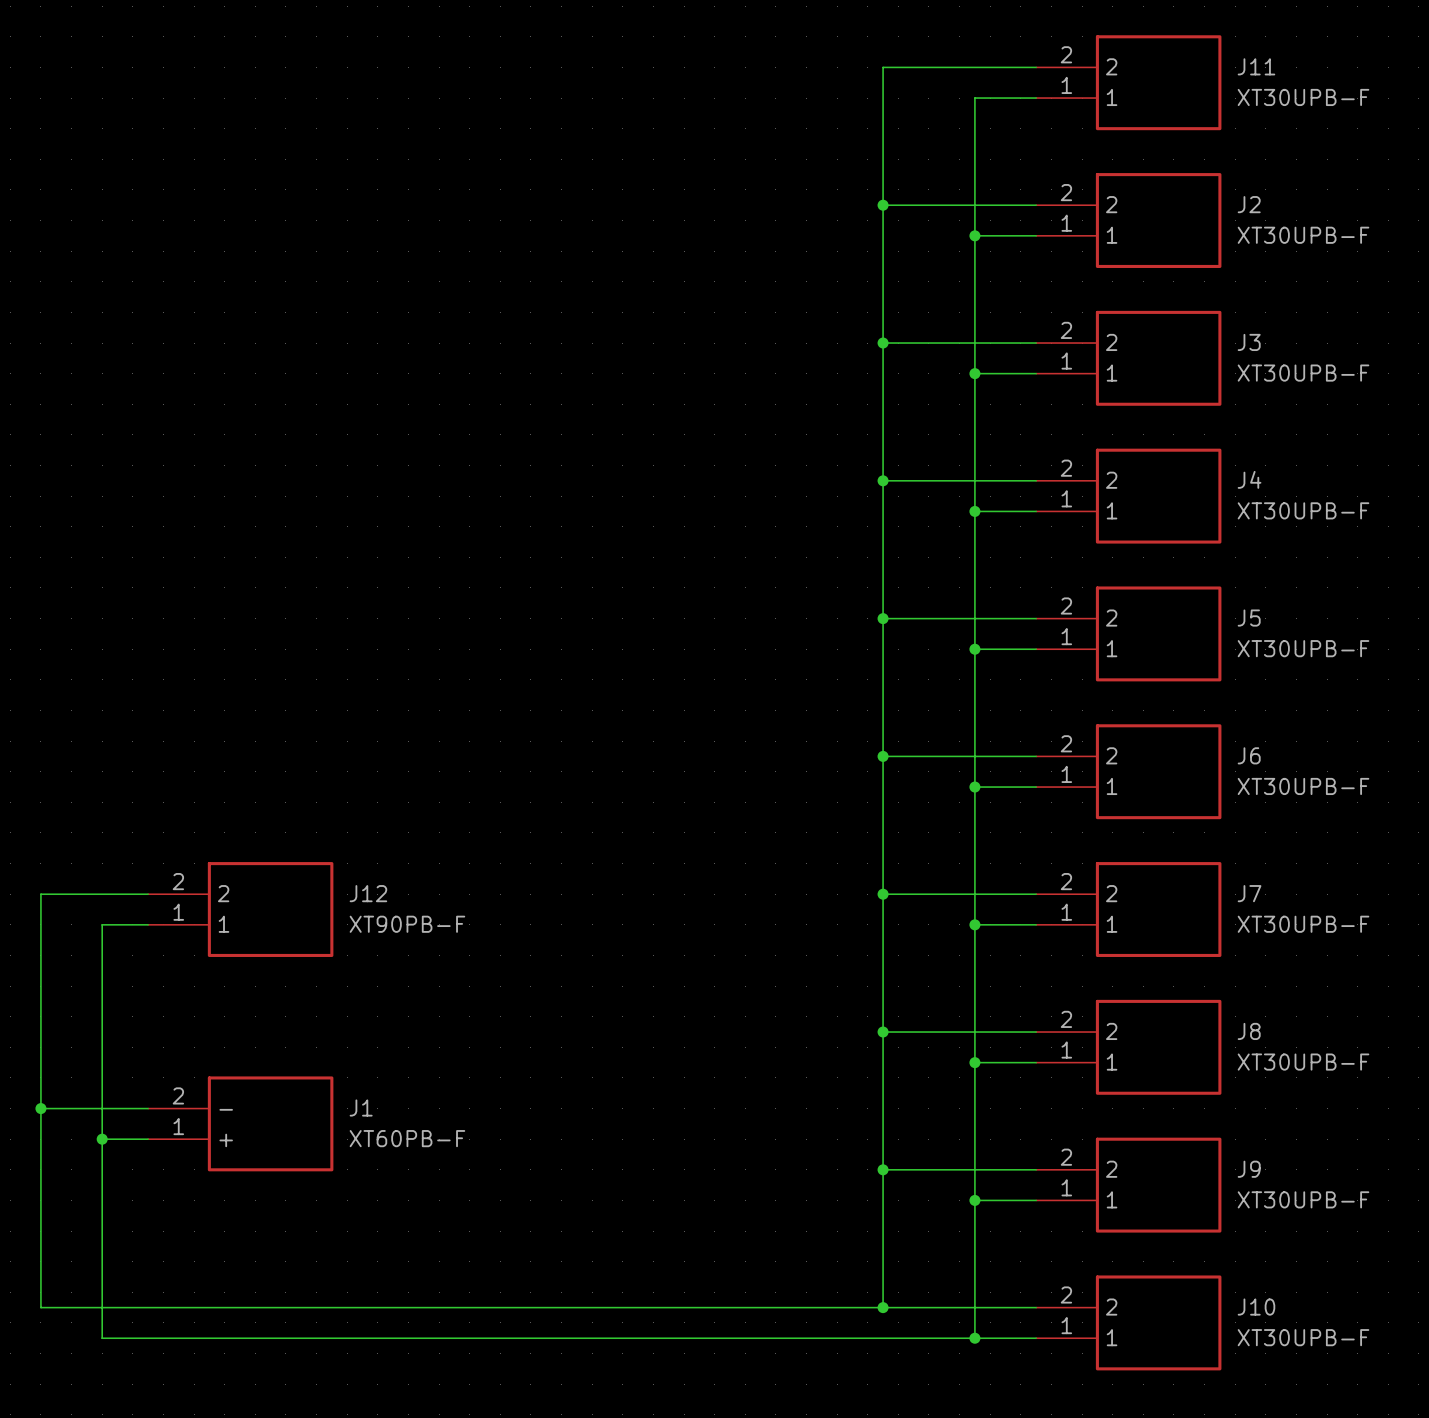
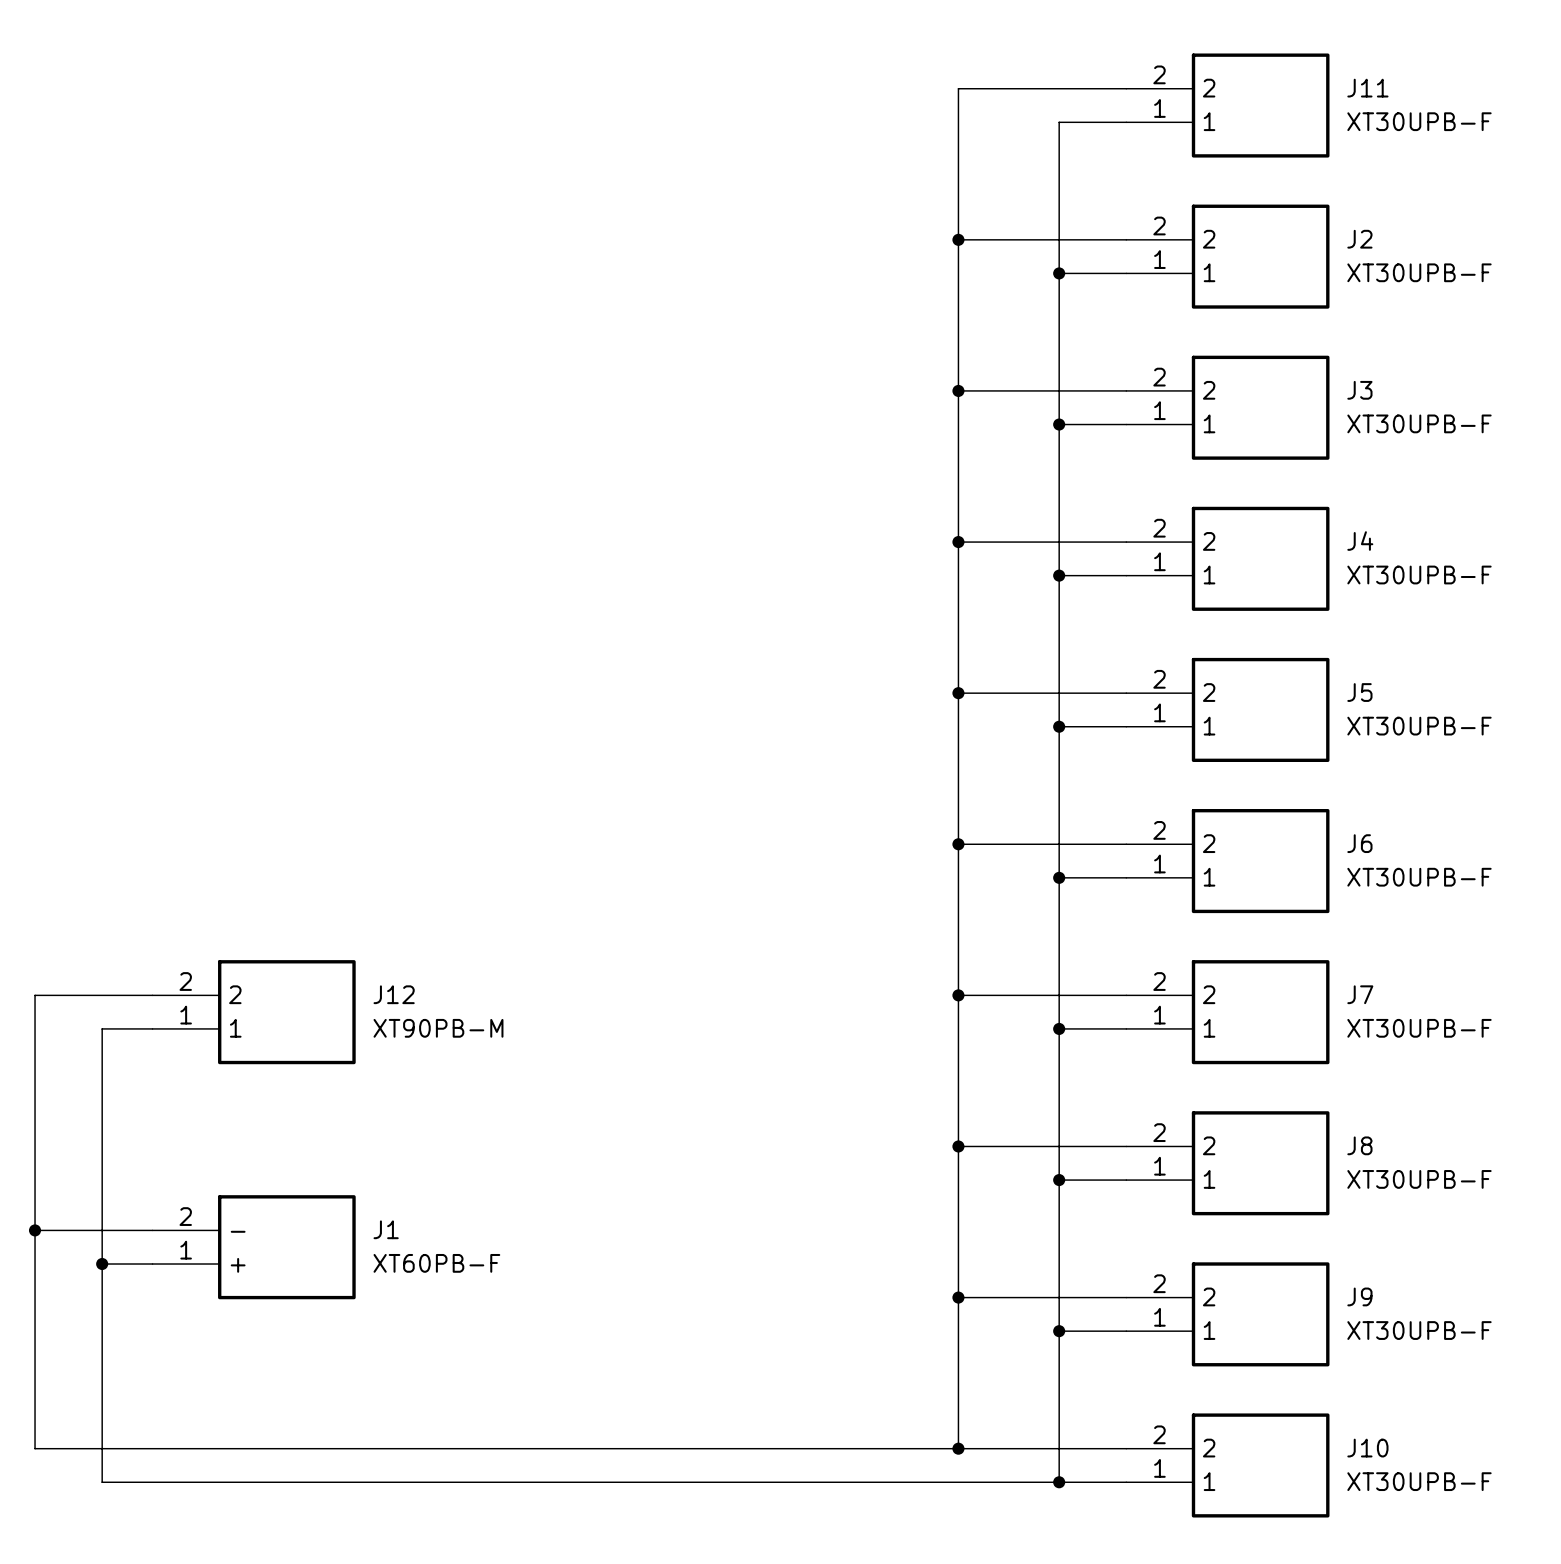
J12 value: XT90PB-F (407, 924) -> XT90PB-M (438, 1028)

